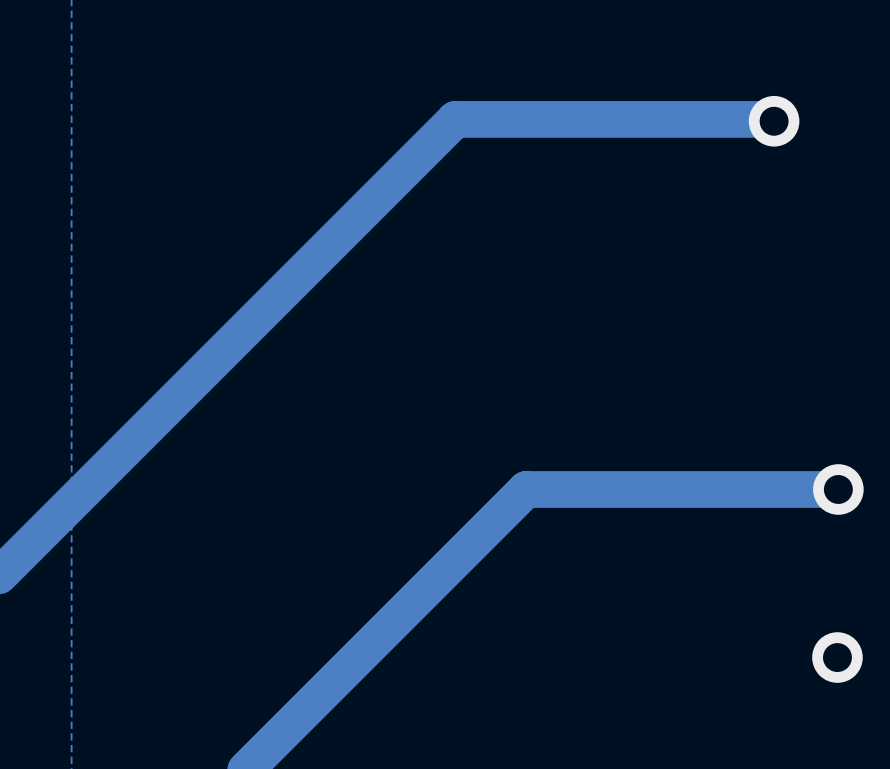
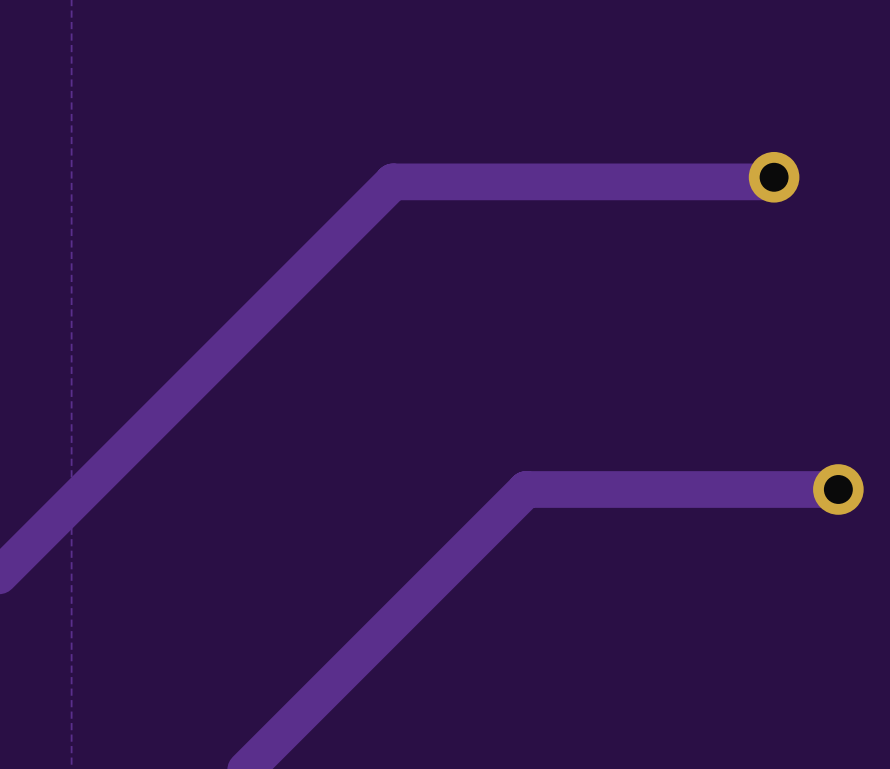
track: (774, 121) (772, 119) (455, 119) (393, 181) -> (774, 177) (769, 181) (393, 181)
via position: (774, 121) -> (774, 177)
via: (837, 657) -> none

